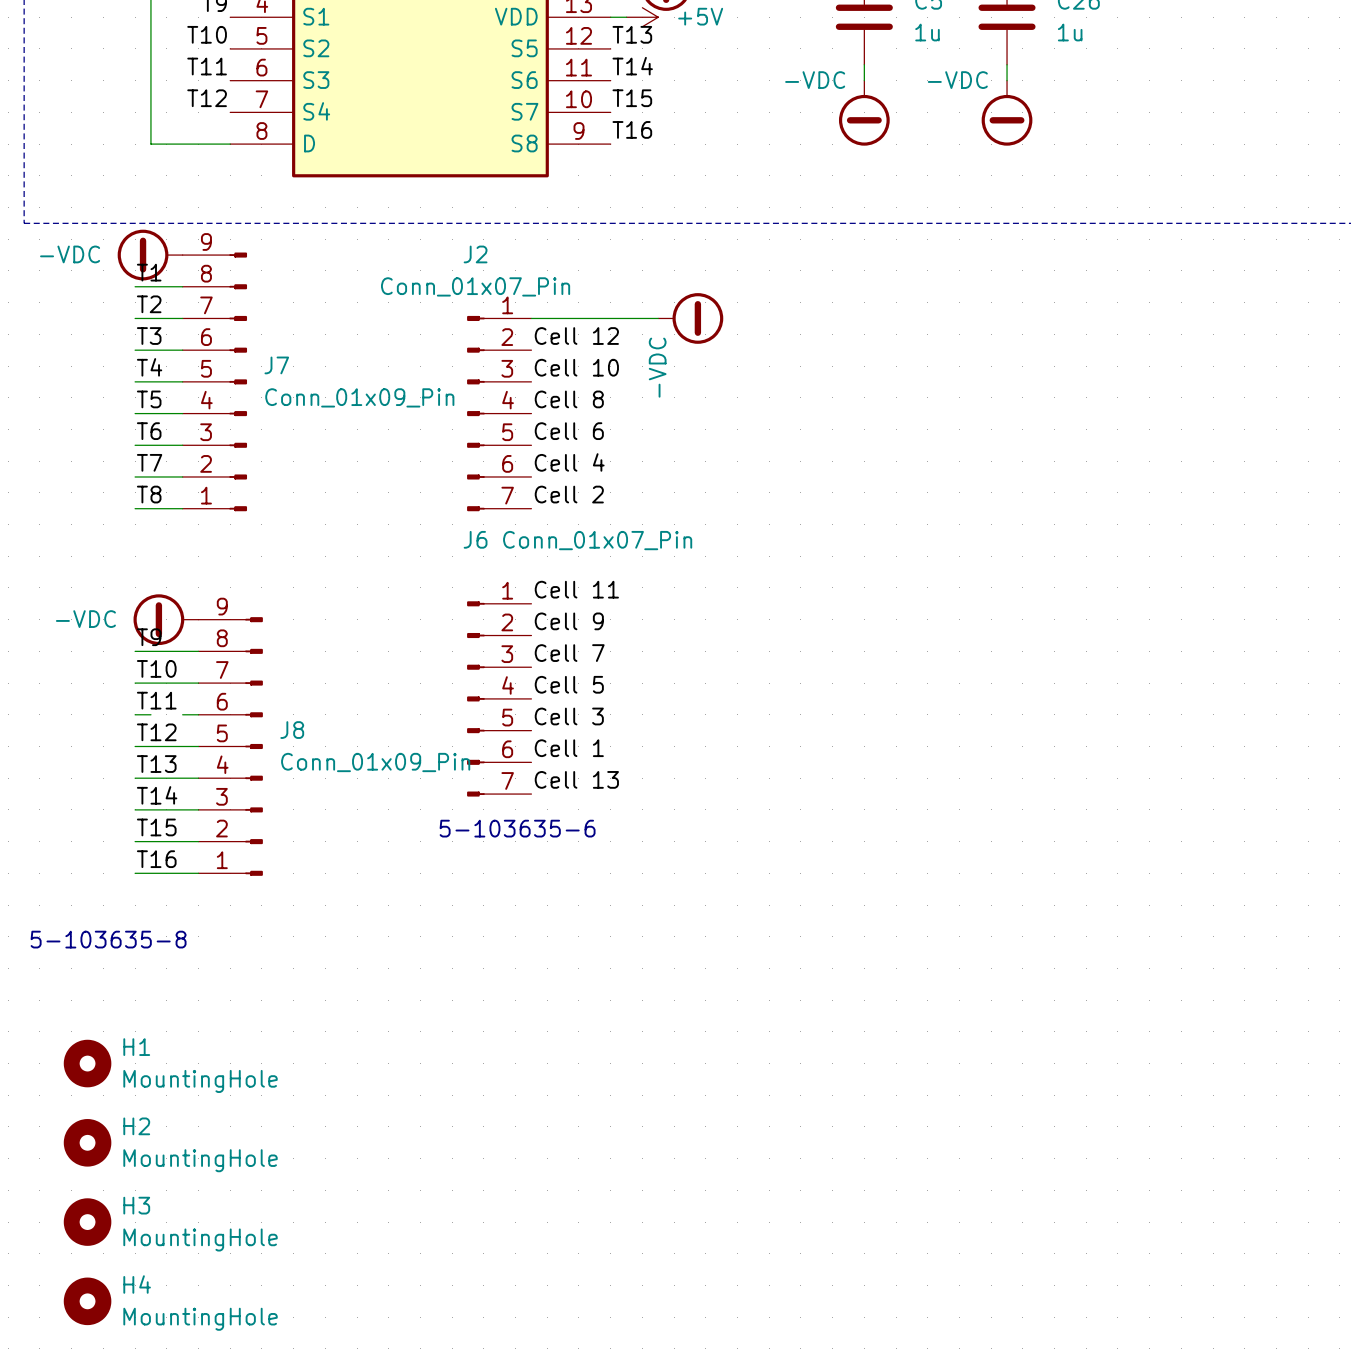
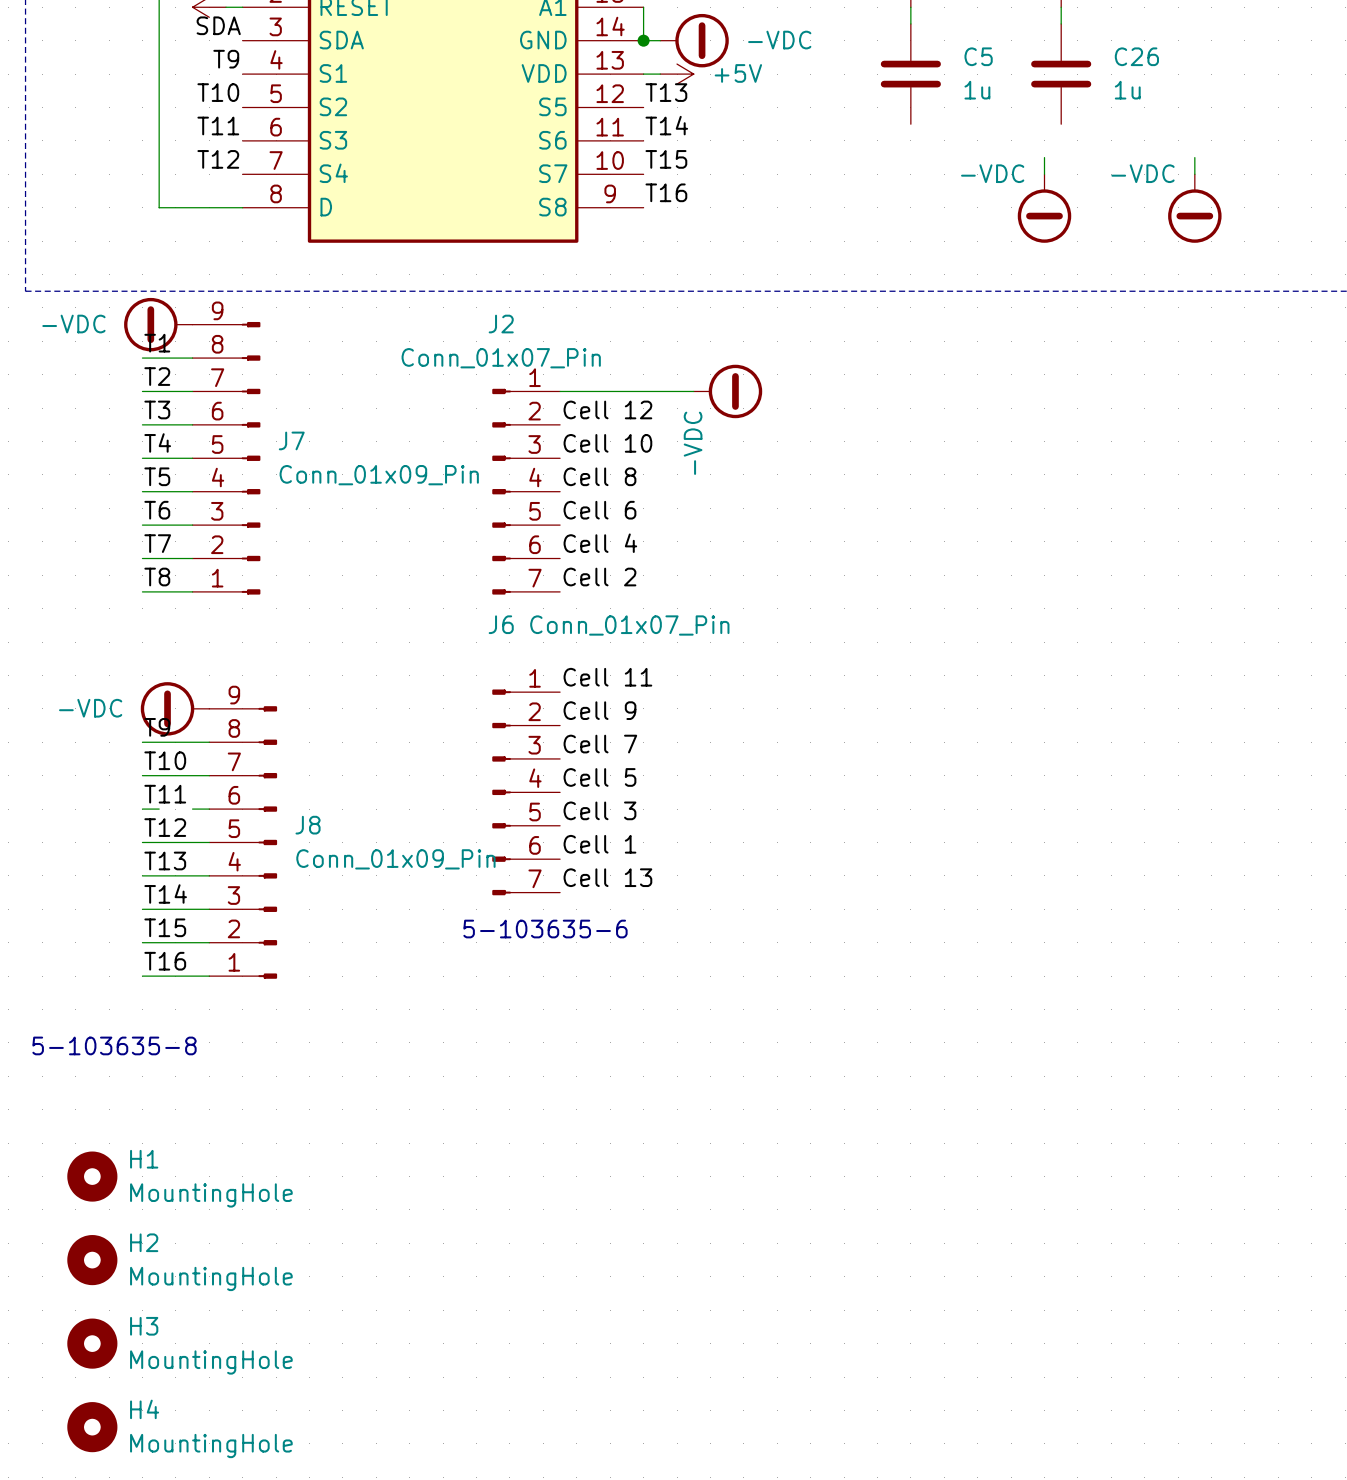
wire: (864, 64) (864, 80) -> (1044, 157) (1044, 174)
wire: (1007, 64) (1007, 80) -> (1194, 157) (1194, 174)
power symbol: -VDC (864, 113) -> none
power symbol position: -VDC (1007, 113) -> -VDC (1044, 208)
power symbol: none -> -VDC (1194, 208)

